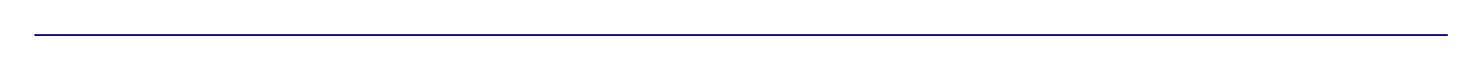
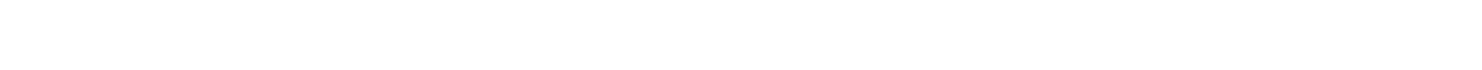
bus: (35, 35) (1447, 35) -> none

